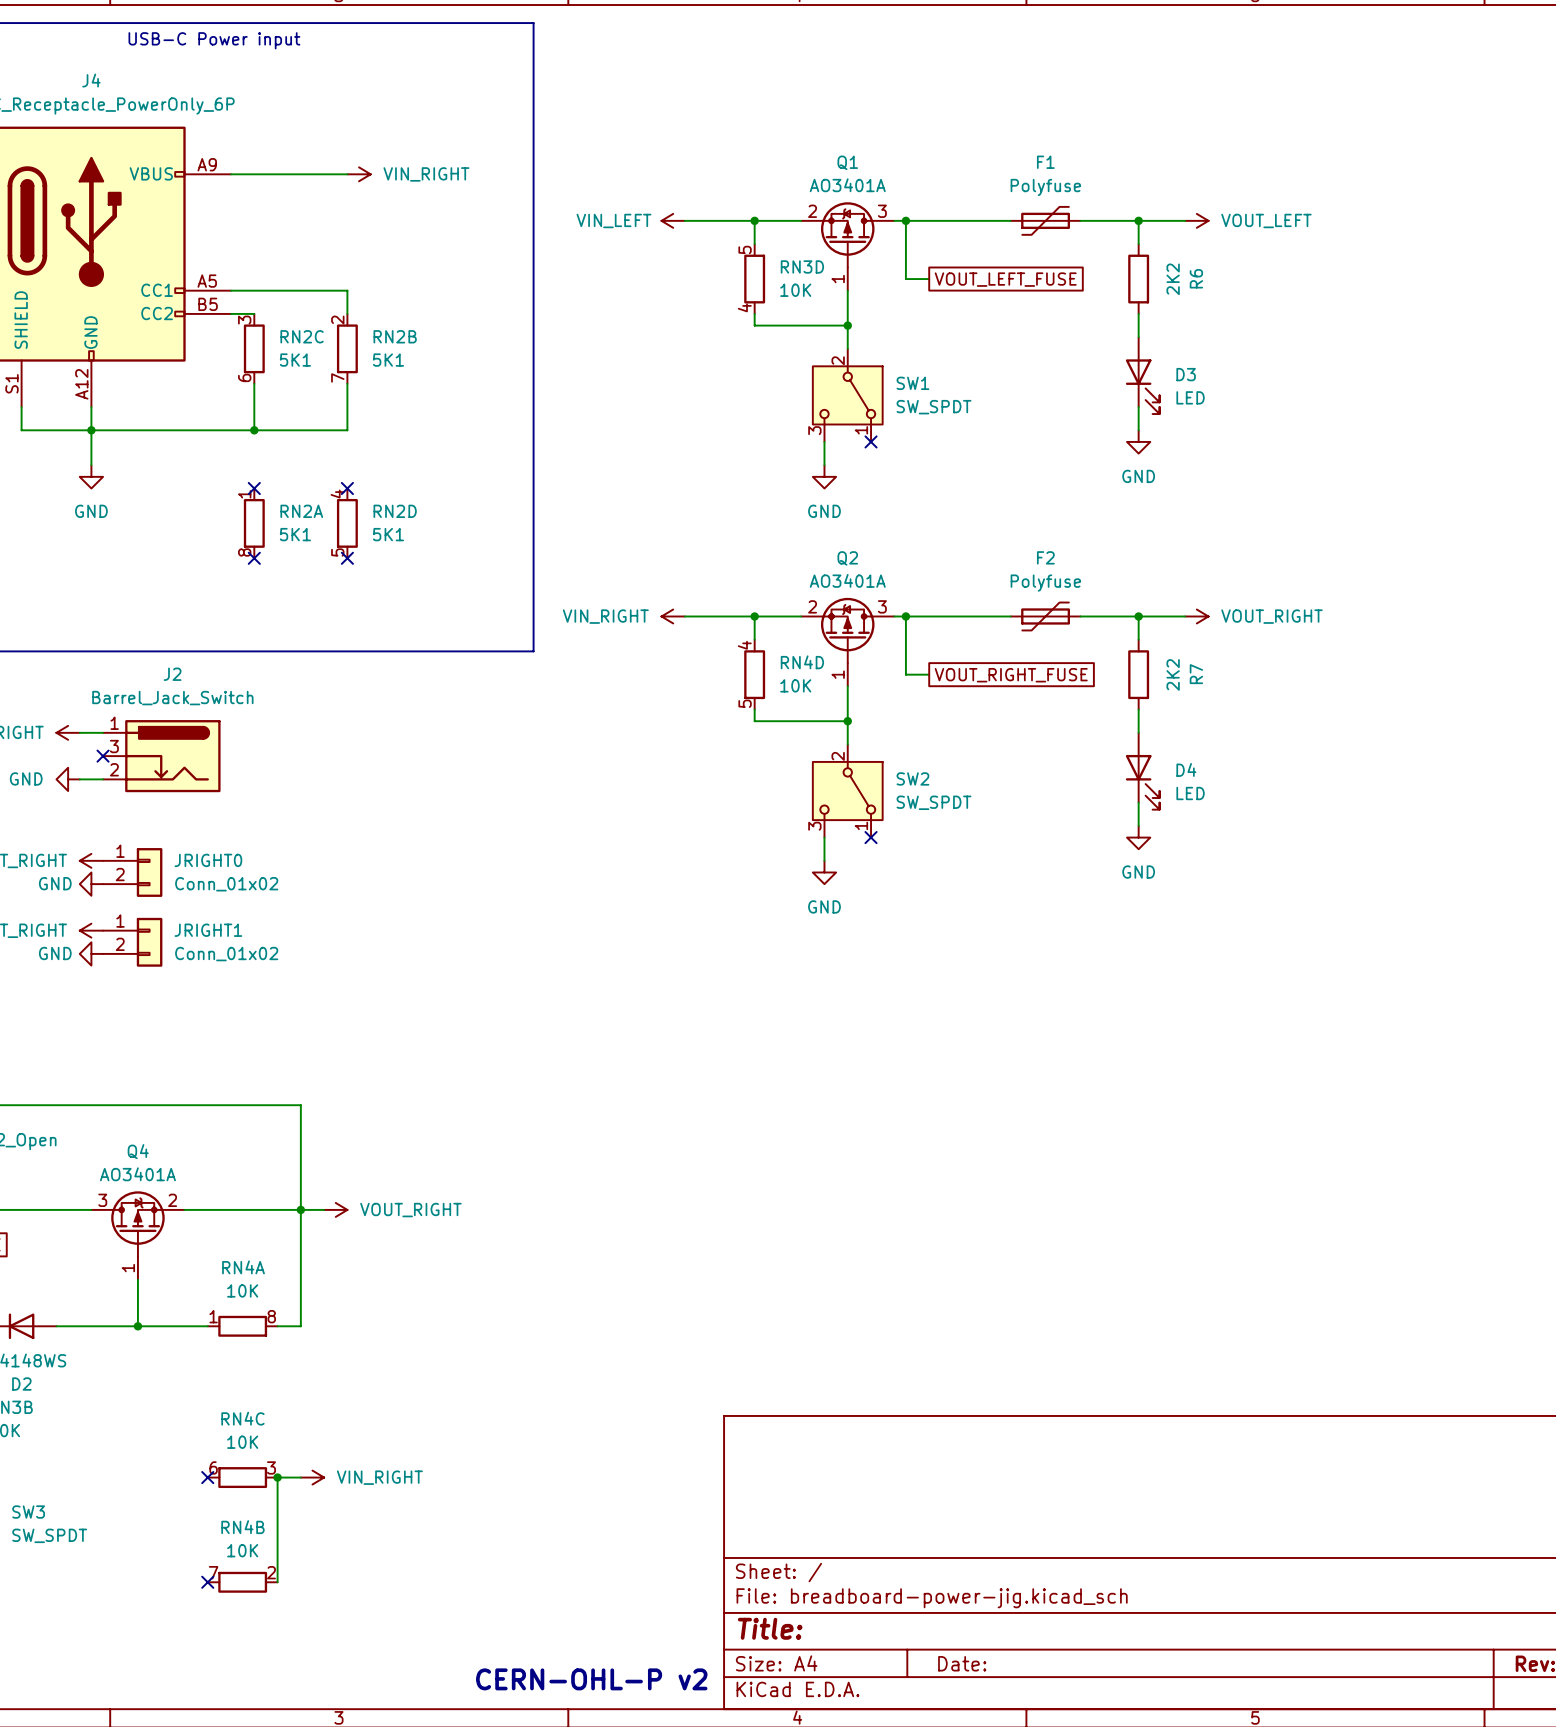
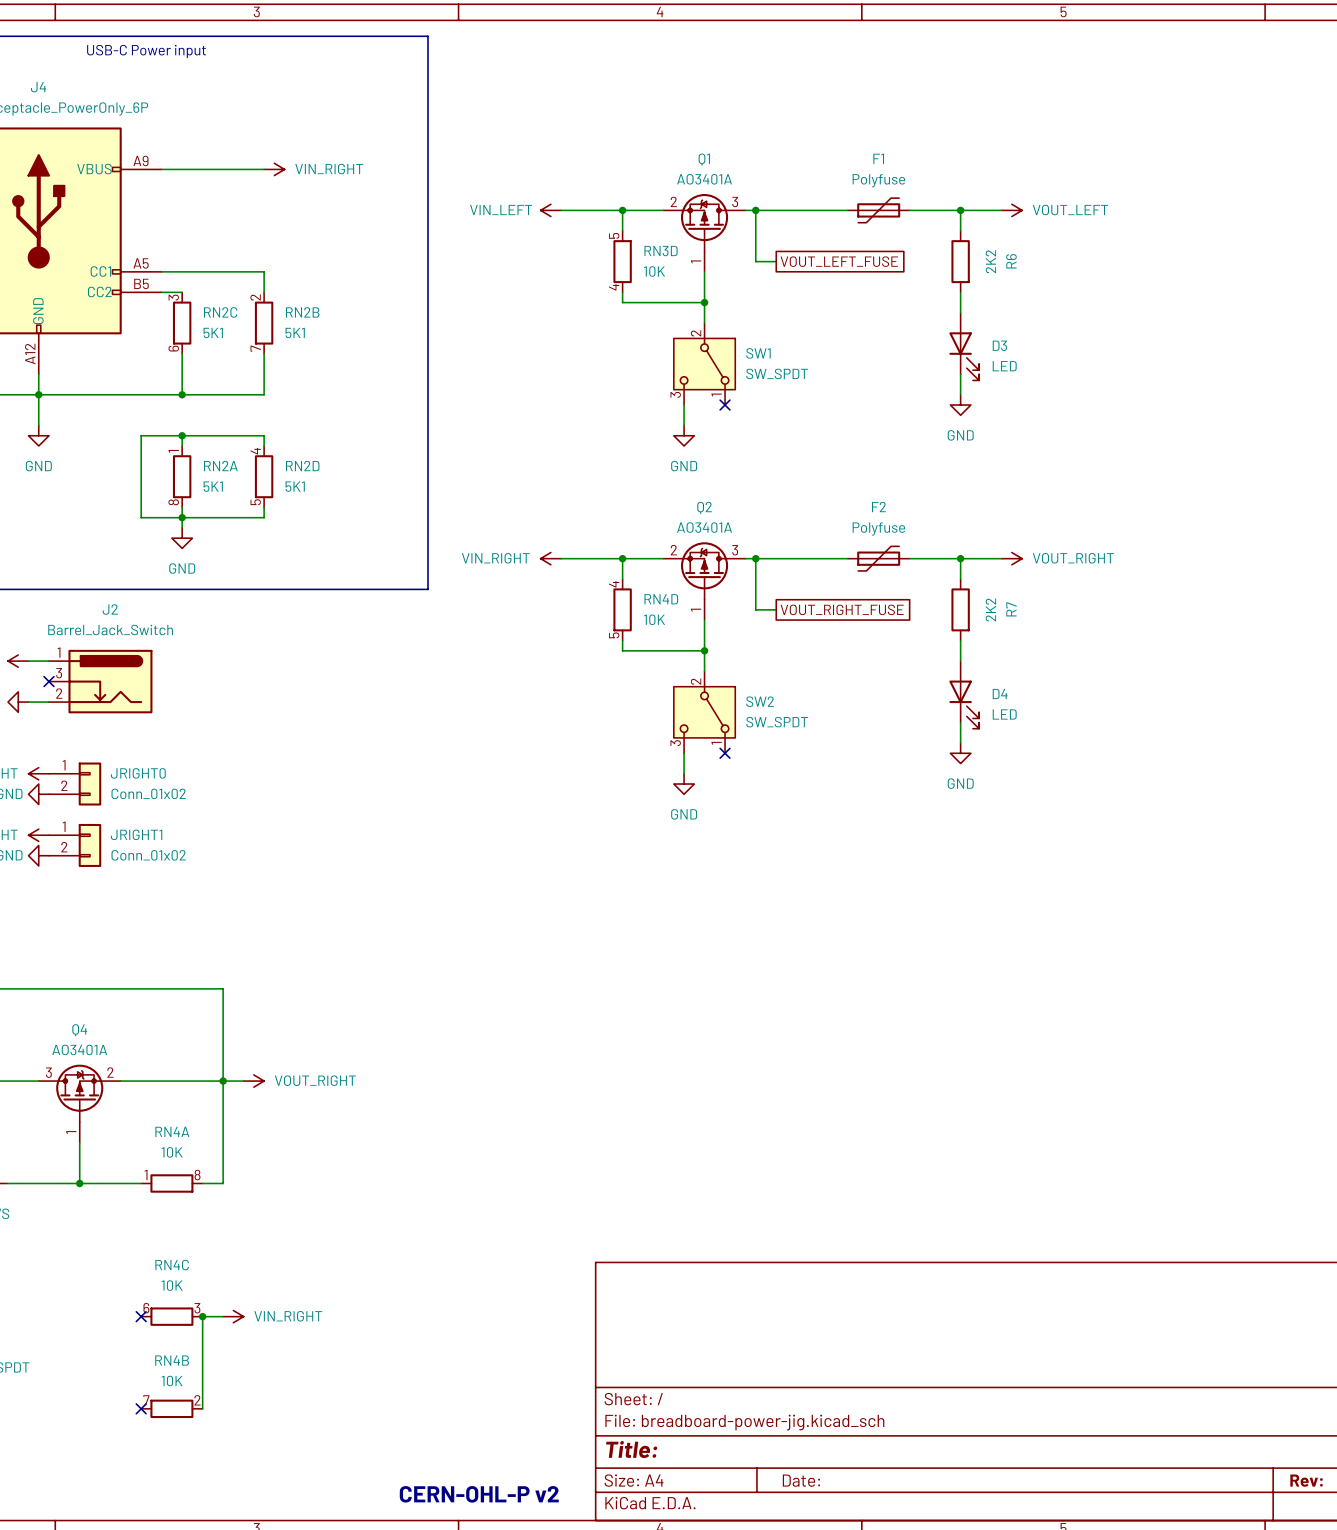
wire: none -> (182, 435) (182, 445)
junction: none -> (182, 435)
no-connect mark: (254, 488) -> none
wire: none -> (264, 445) (264, 435) (141, 435) (141, 517) (264, 517) (264, 507)
no-connect mark: (347, 488) -> none
wire: none -> (182, 507) (182, 527)
no-connect mark: (254, 558) -> none
no-connect mark: (347, 558) -> none
junction: none -> (182, 517)
power symbol: none -> GND (182, 538)

